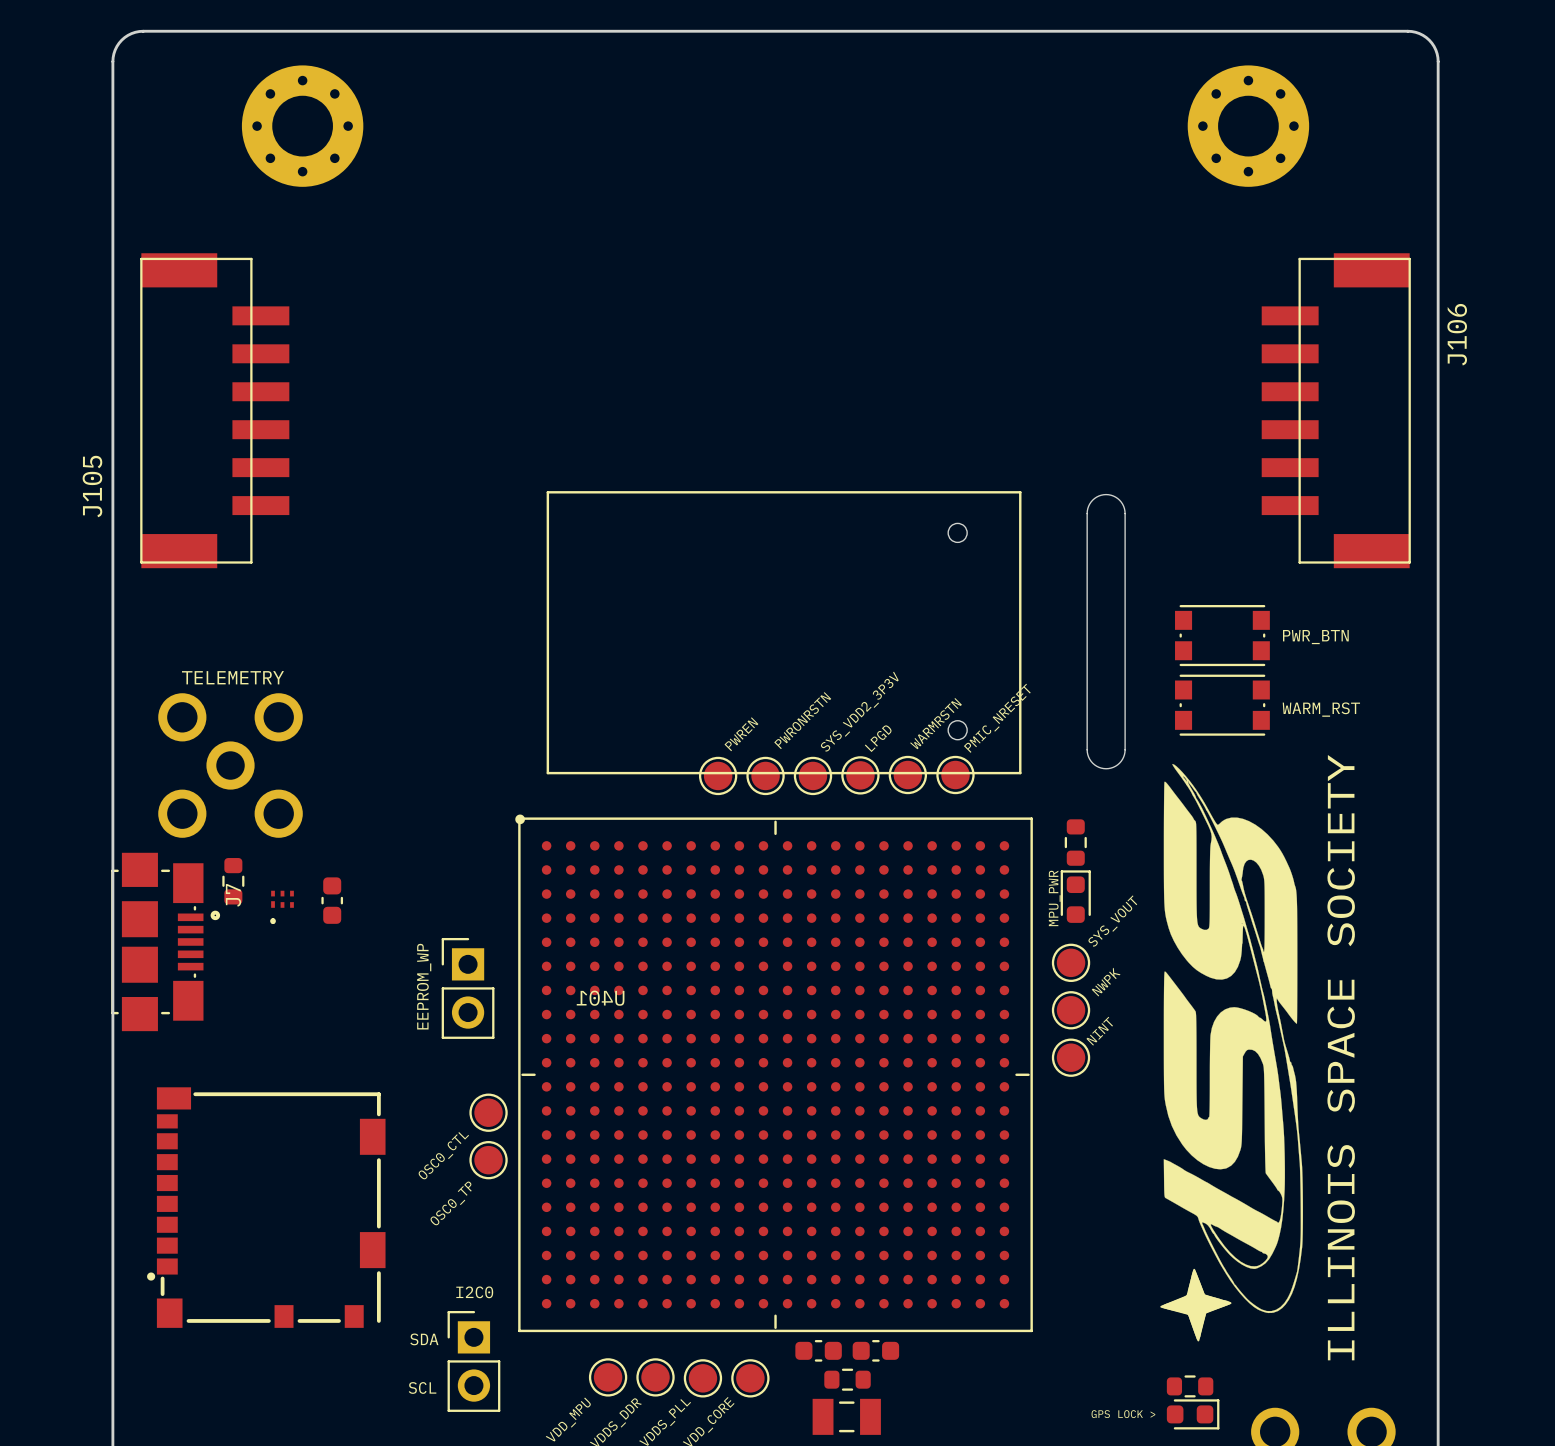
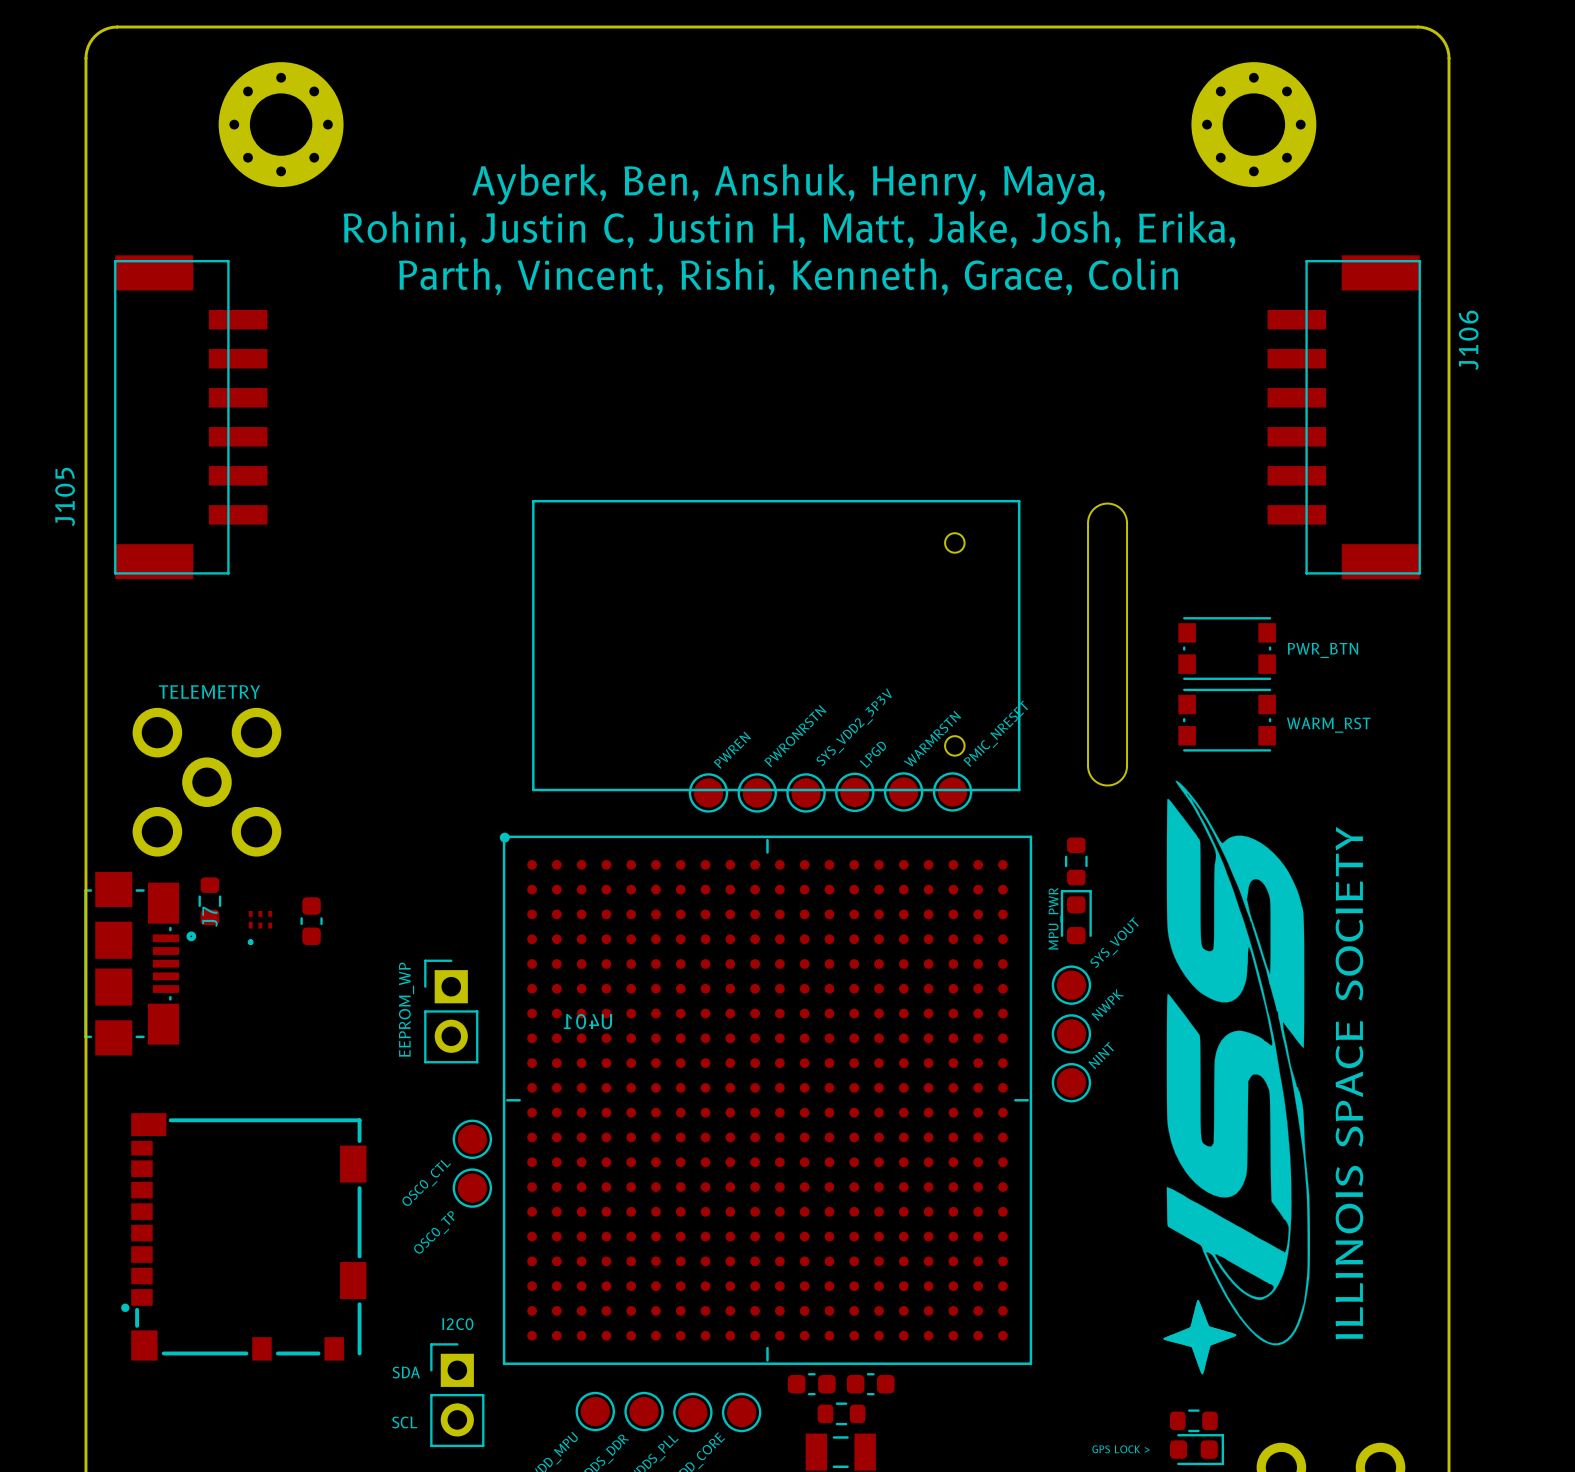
text: none -> Ayberk, Ben, Anshuk, Henry, Maya, (788, 184)
text: none -> Rohini, Justin C, Justin H, Matt, Jake, Josh, Erika, (789, 229)
text: none -> Parth, Vincent, Rishi, Kenneth, Grace, Colin (788, 276)

